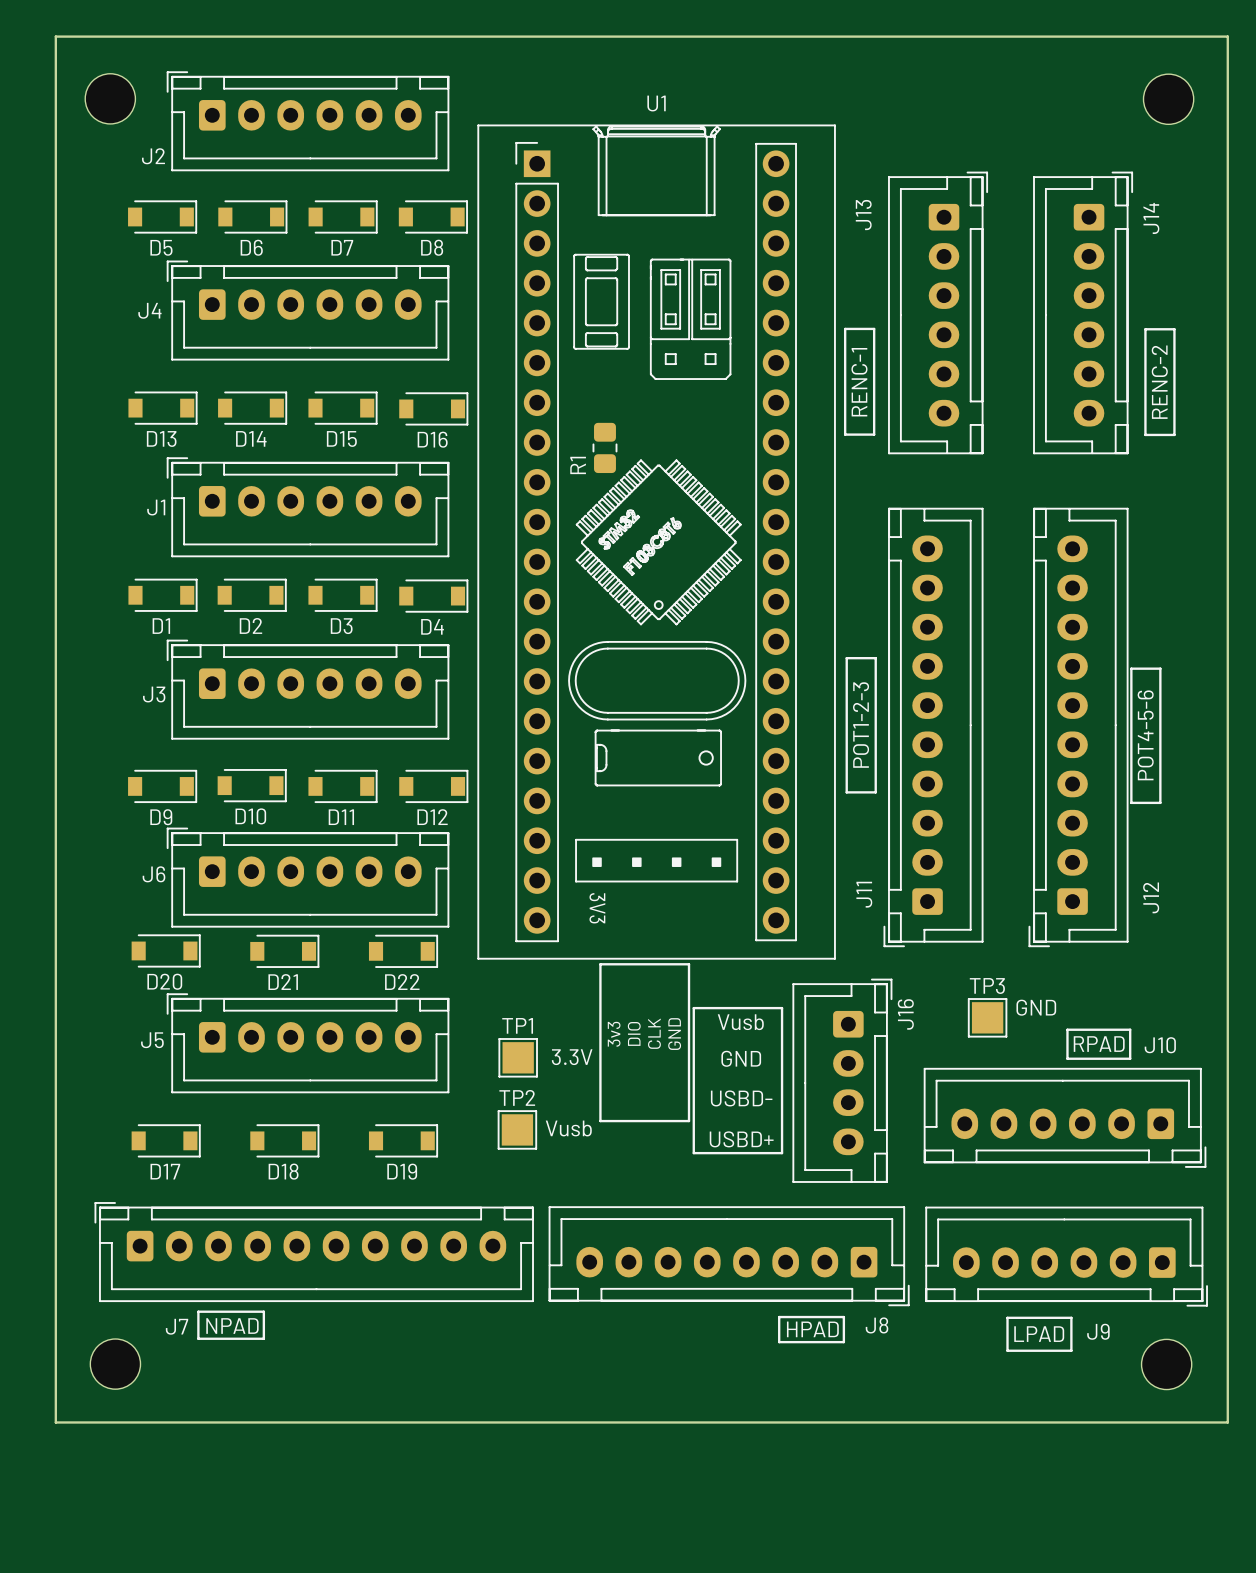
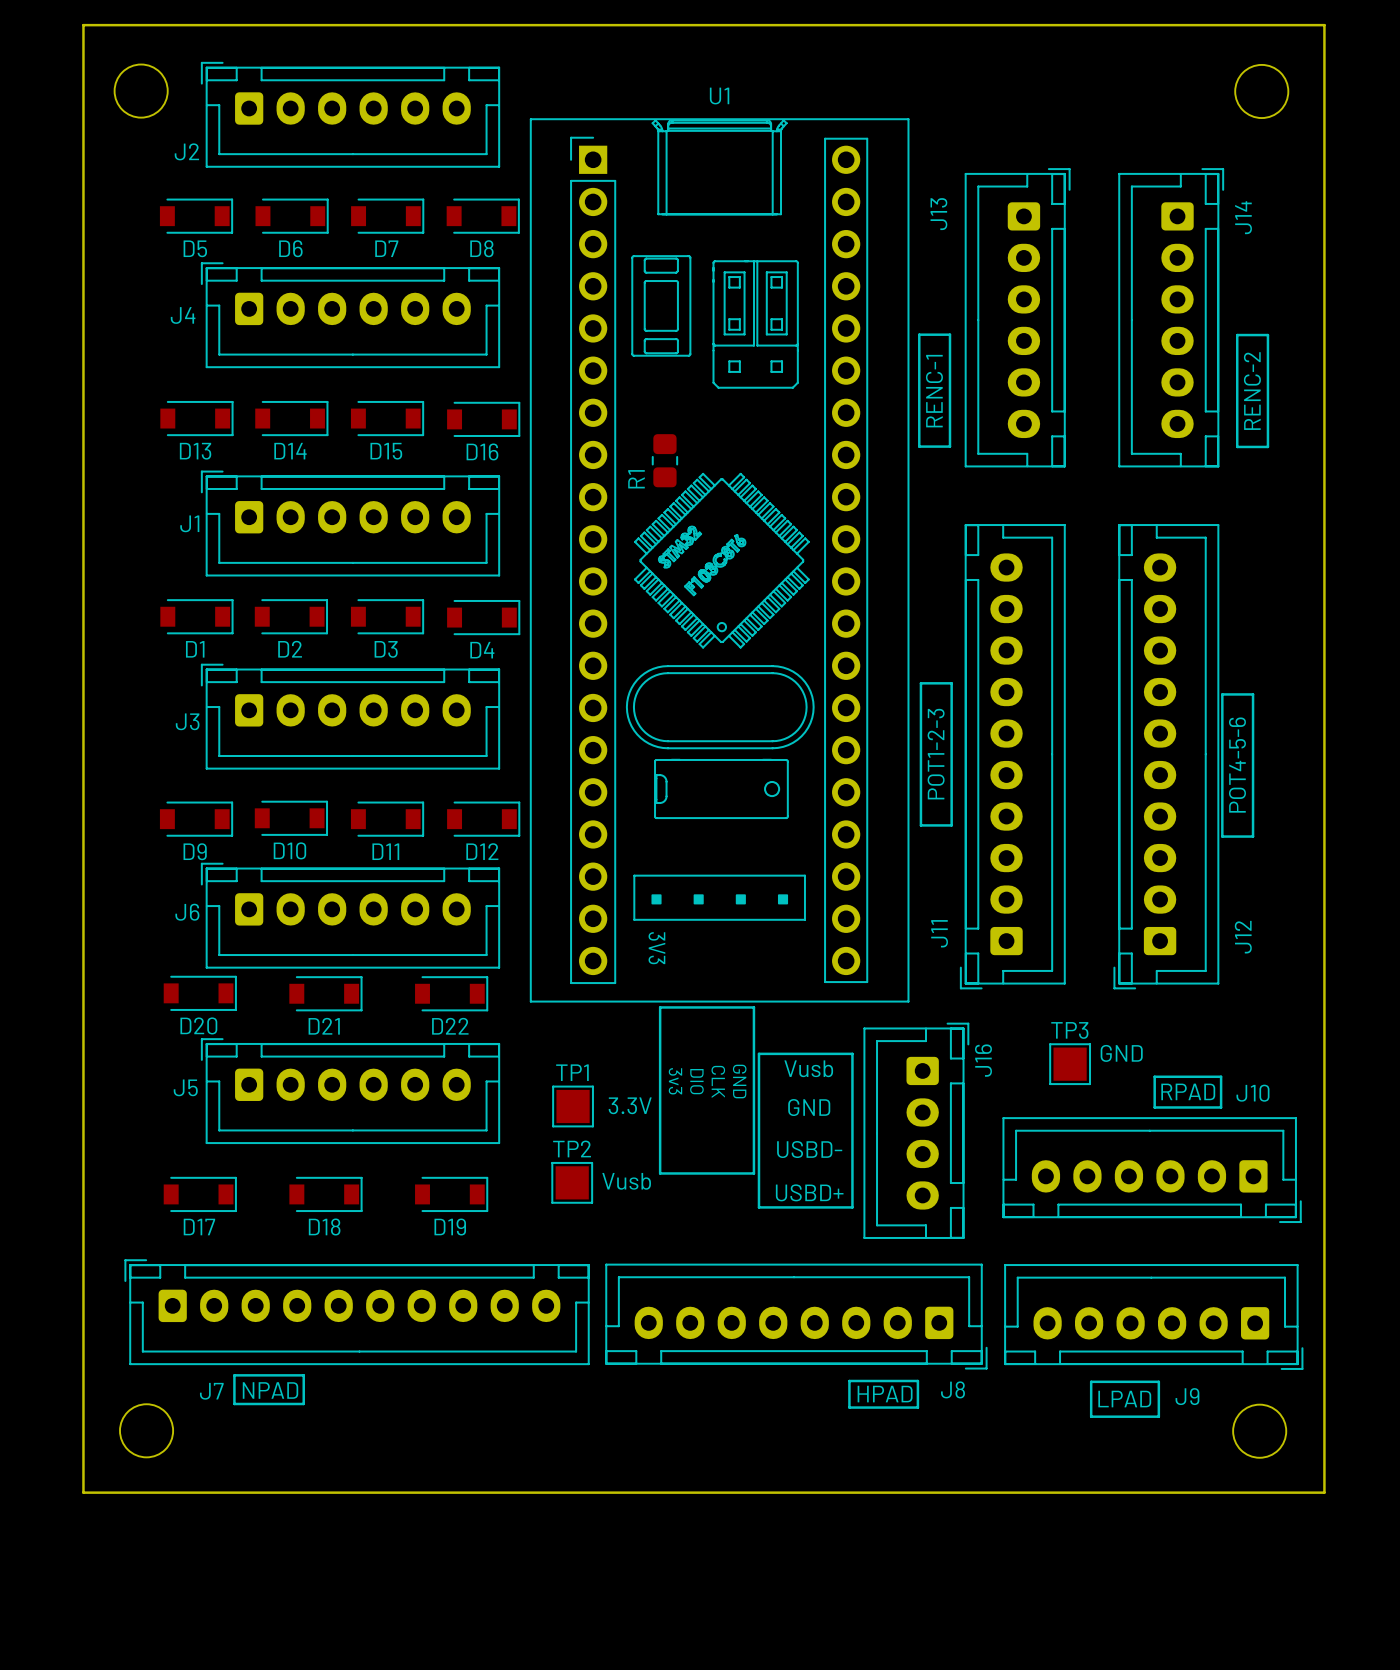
text rotation: 0° (634, 1033) -> 180° (696, 1081)
text rotation: 0° (654, 1033) -> 180° (718, 1081)
text rotation: 0° (614, 1034) -> 180° (675, 1081)
text rotation: 0° (674, 1034) -> 180° (739, 1081)

